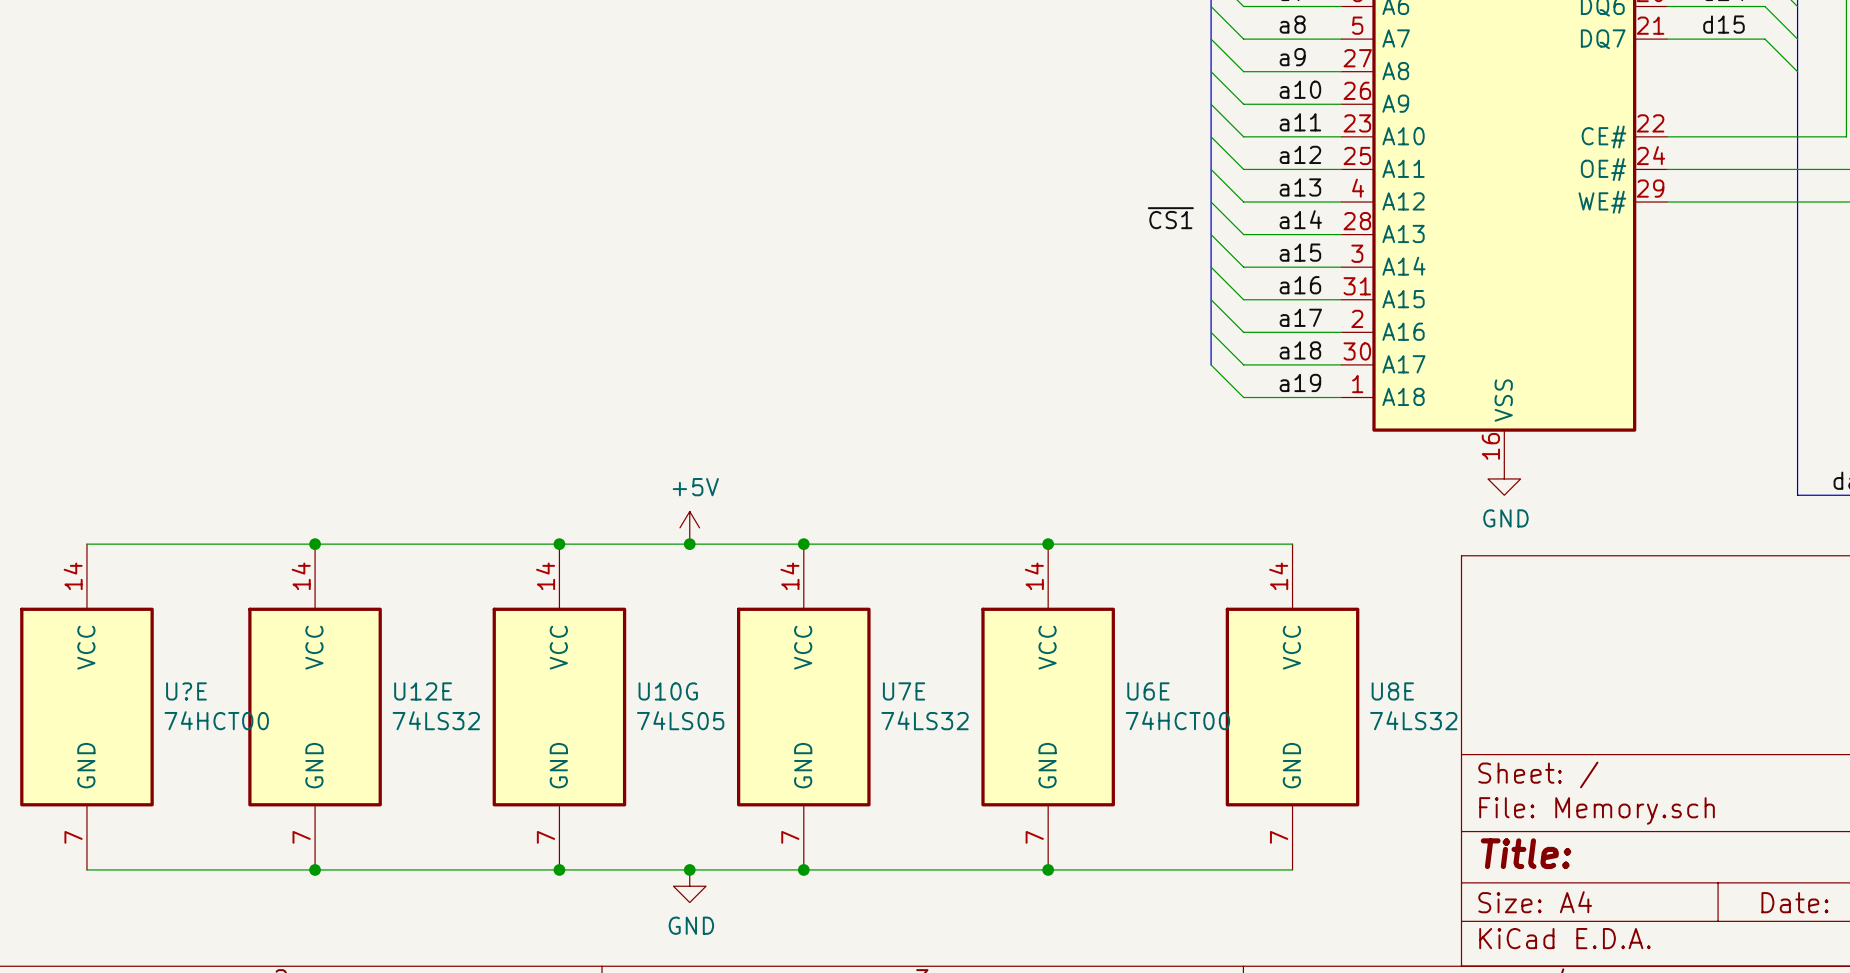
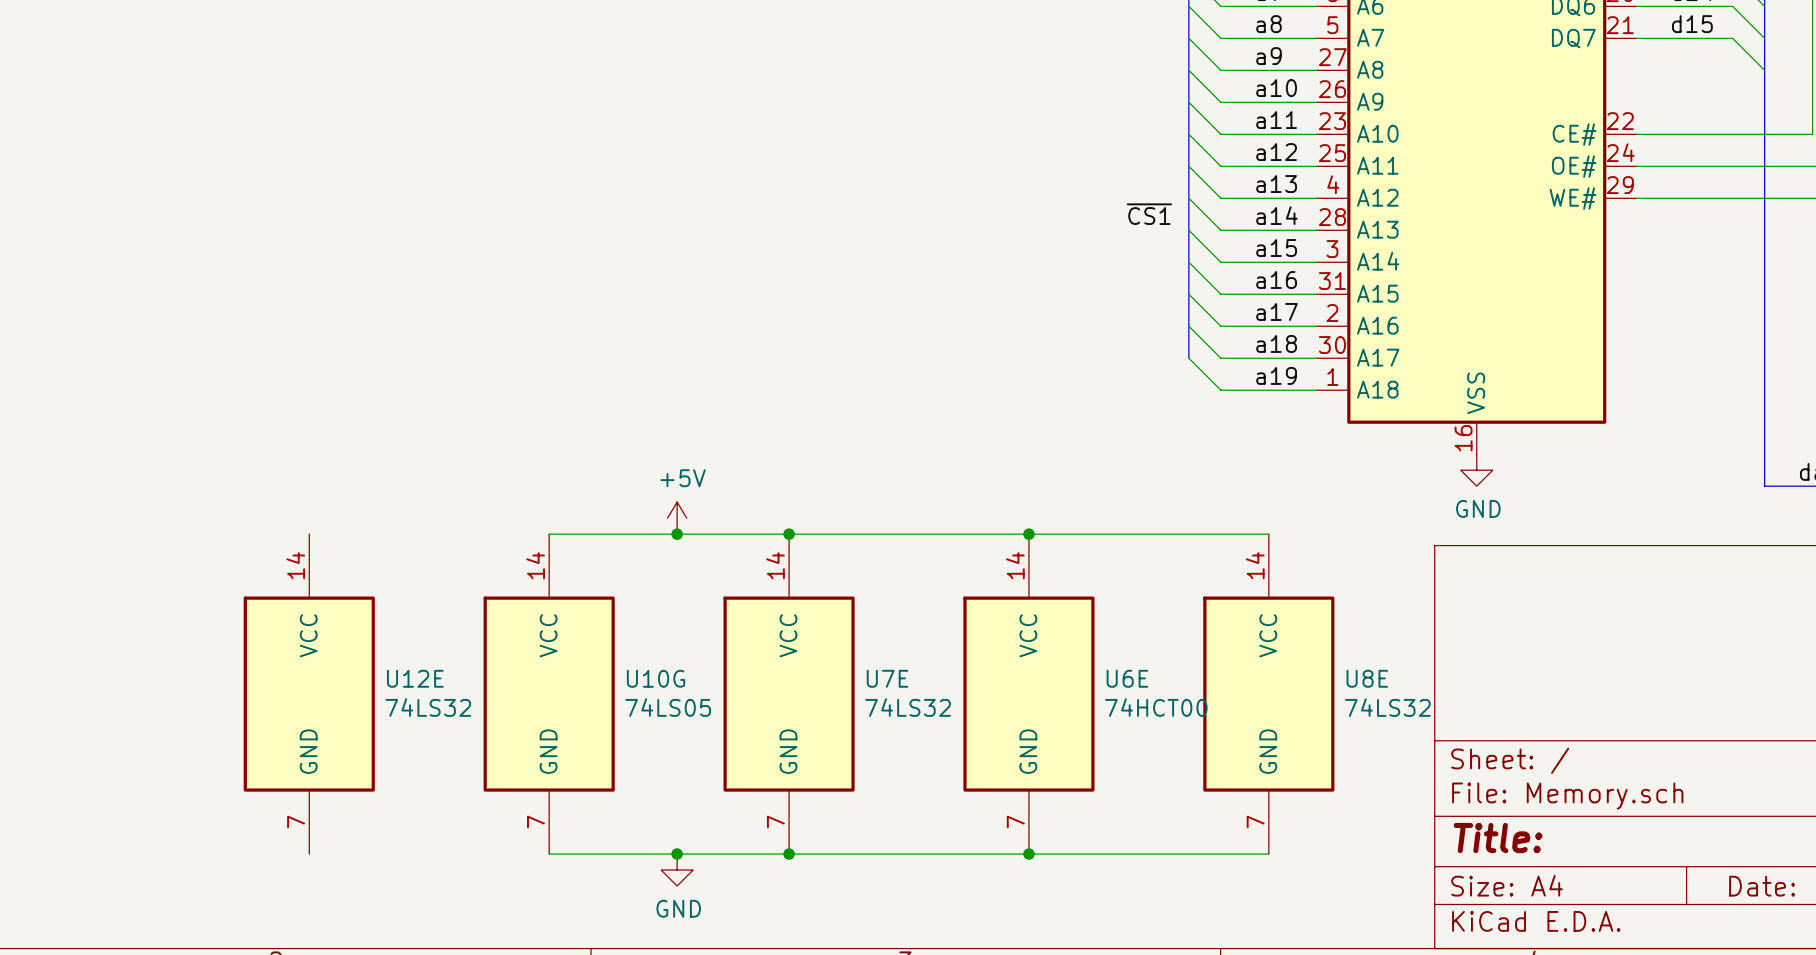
wire: (86, 544) (559, 544) -> none
junction: (315, 544) -> none
junction: (559, 544) -> none
U?E: 74HCT00 (86, 707) -> none
wire: (86, 869) (559, 869) -> none
junction: (315, 869) -> none
junction: (559, 869) -> none

